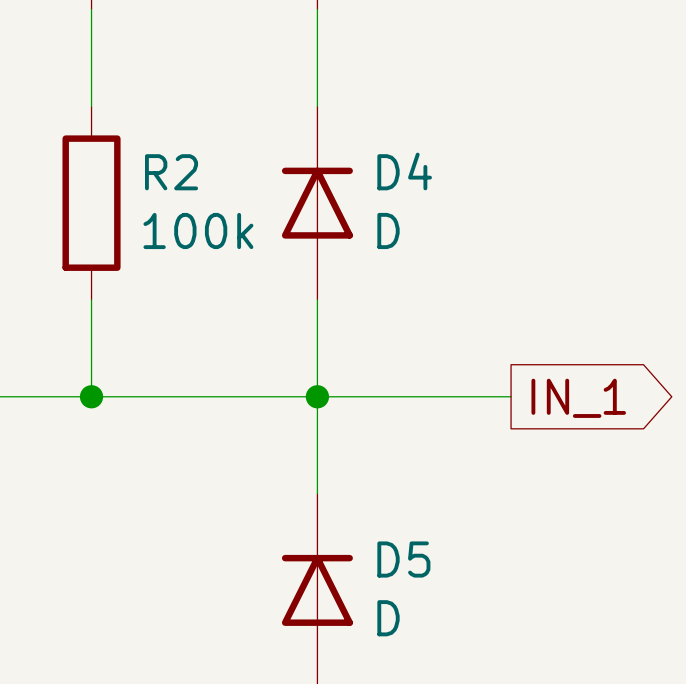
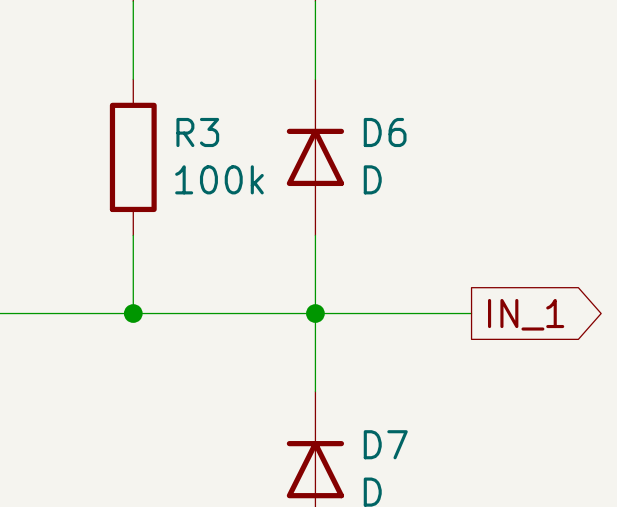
D4 name: D4 (404, 171) -> D6 (385, 132)
R2 name: R2 (171, 172) -> R3 (197, 132)
D5 name: D5 (403, 559) -> D7 (385, 444)

